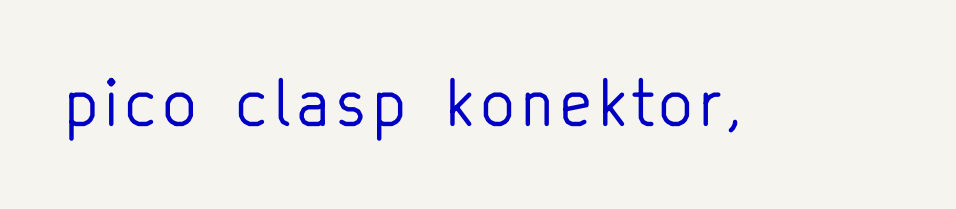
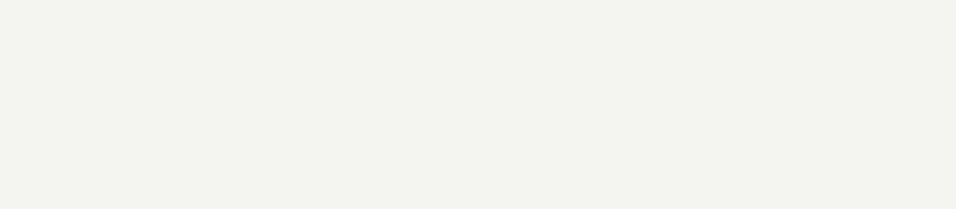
text: pico clasp konektor, (403, 109) -> none

